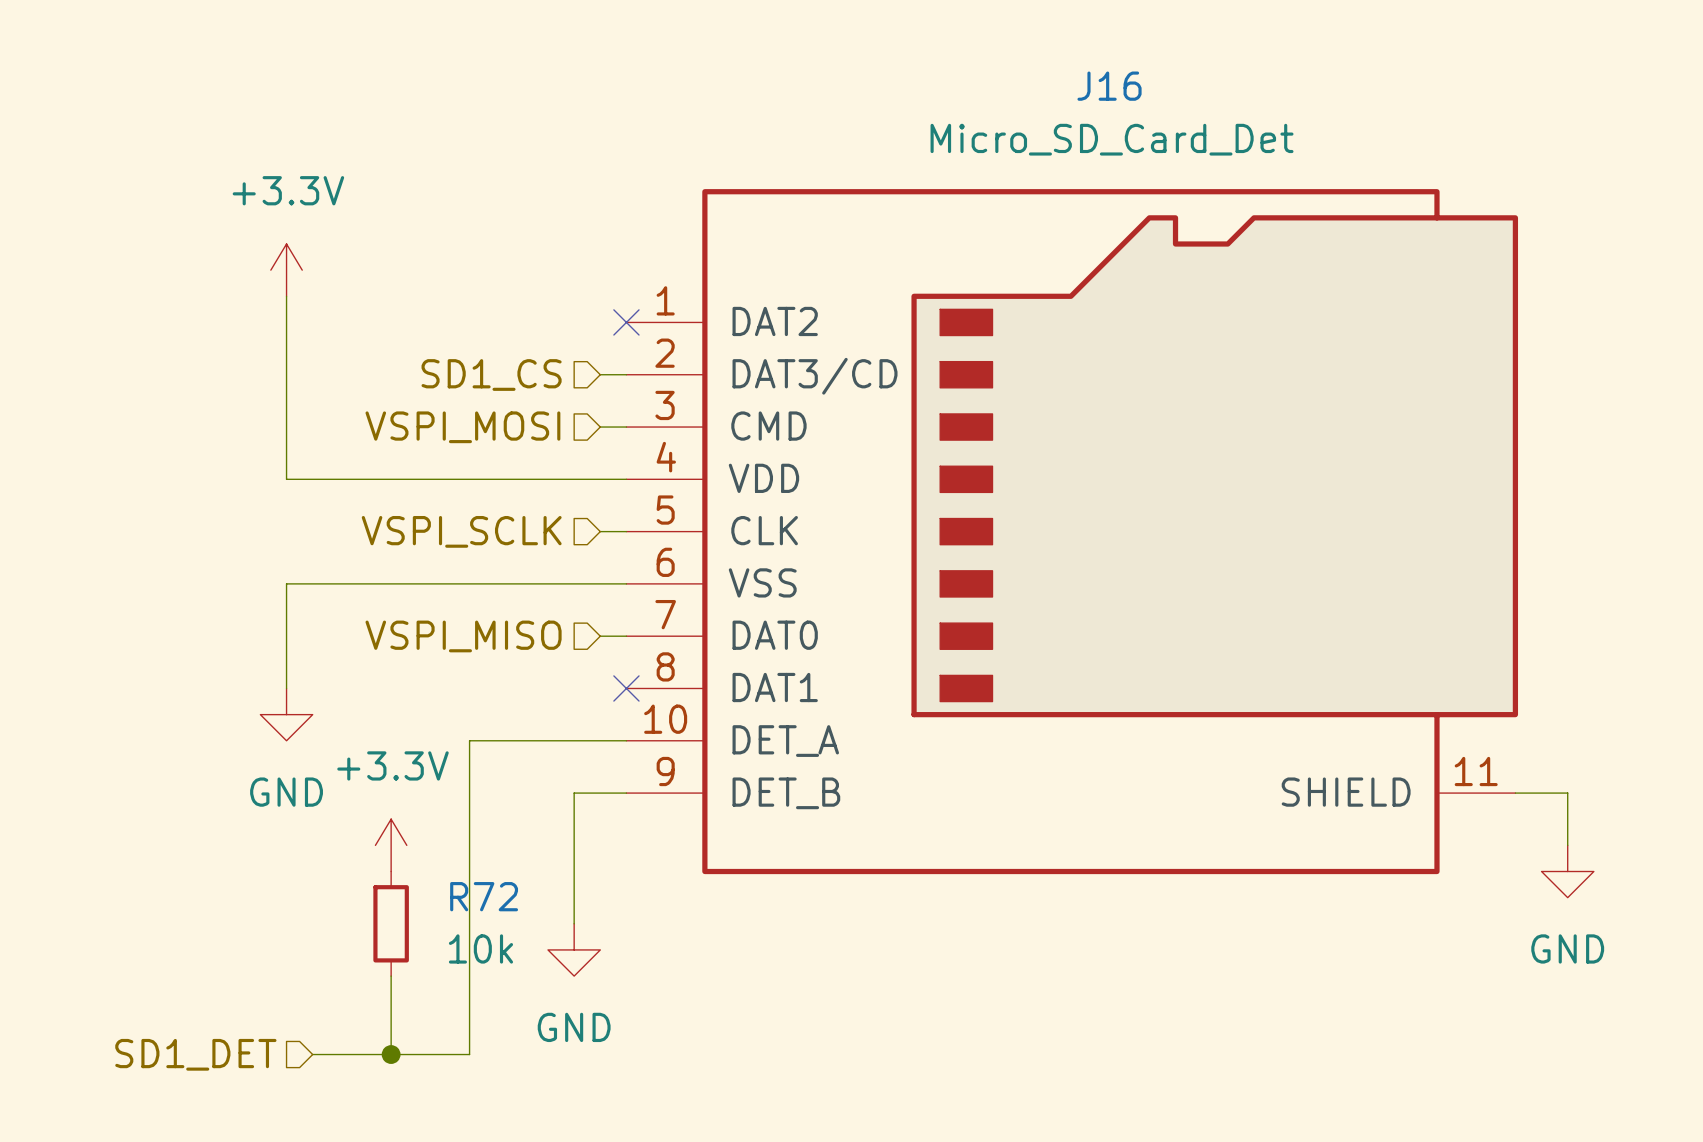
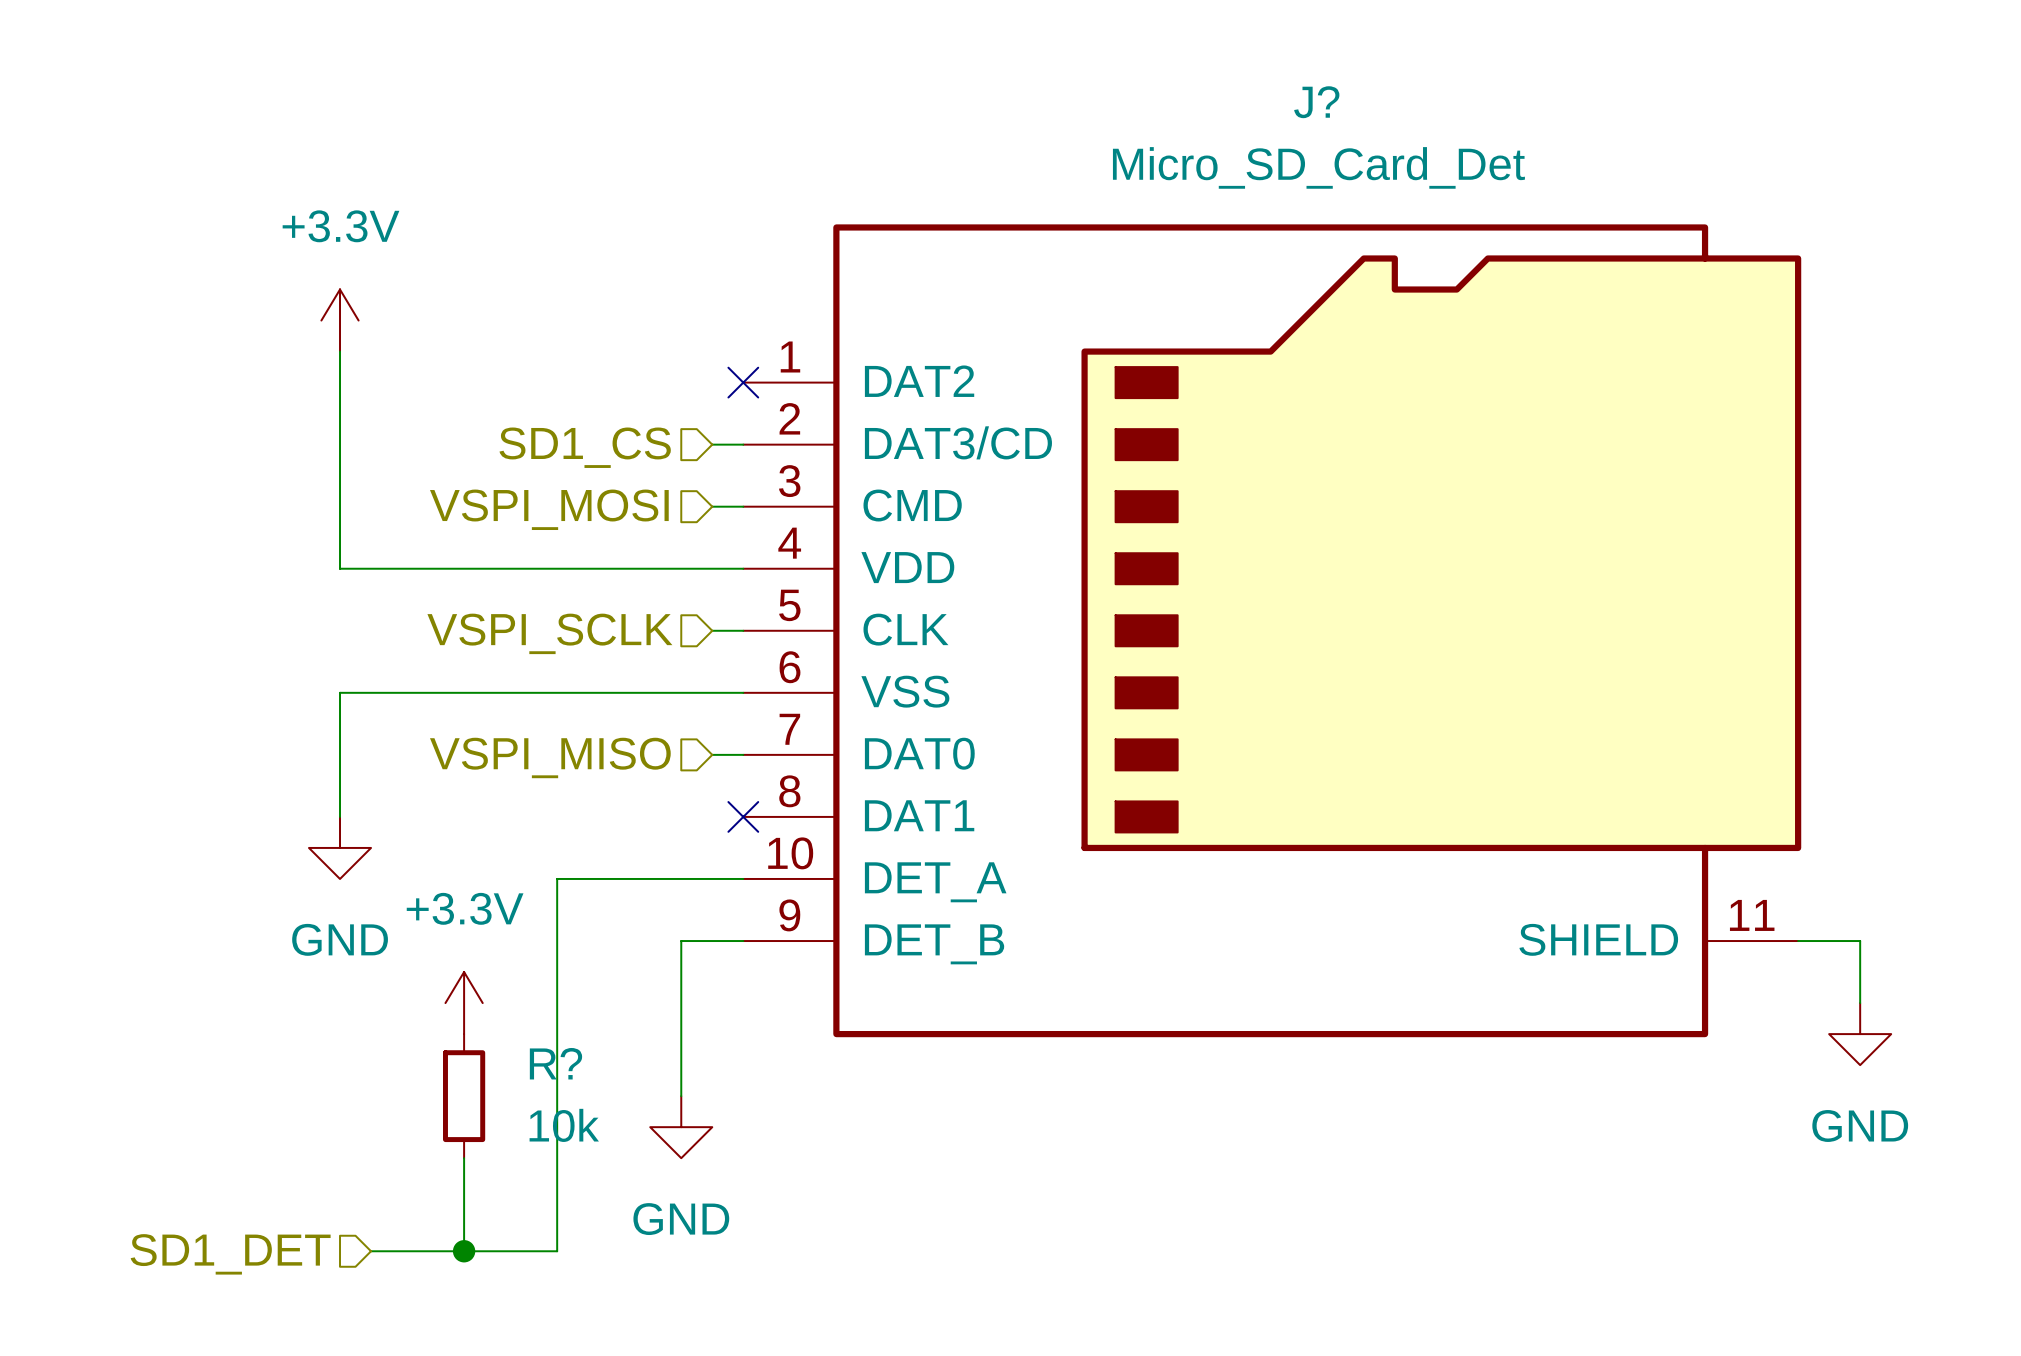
J16 name: J16 (1109, 86) -> J? (1316, 102)
R72 name: R72 (484, 896) -> R? (555, 1063)

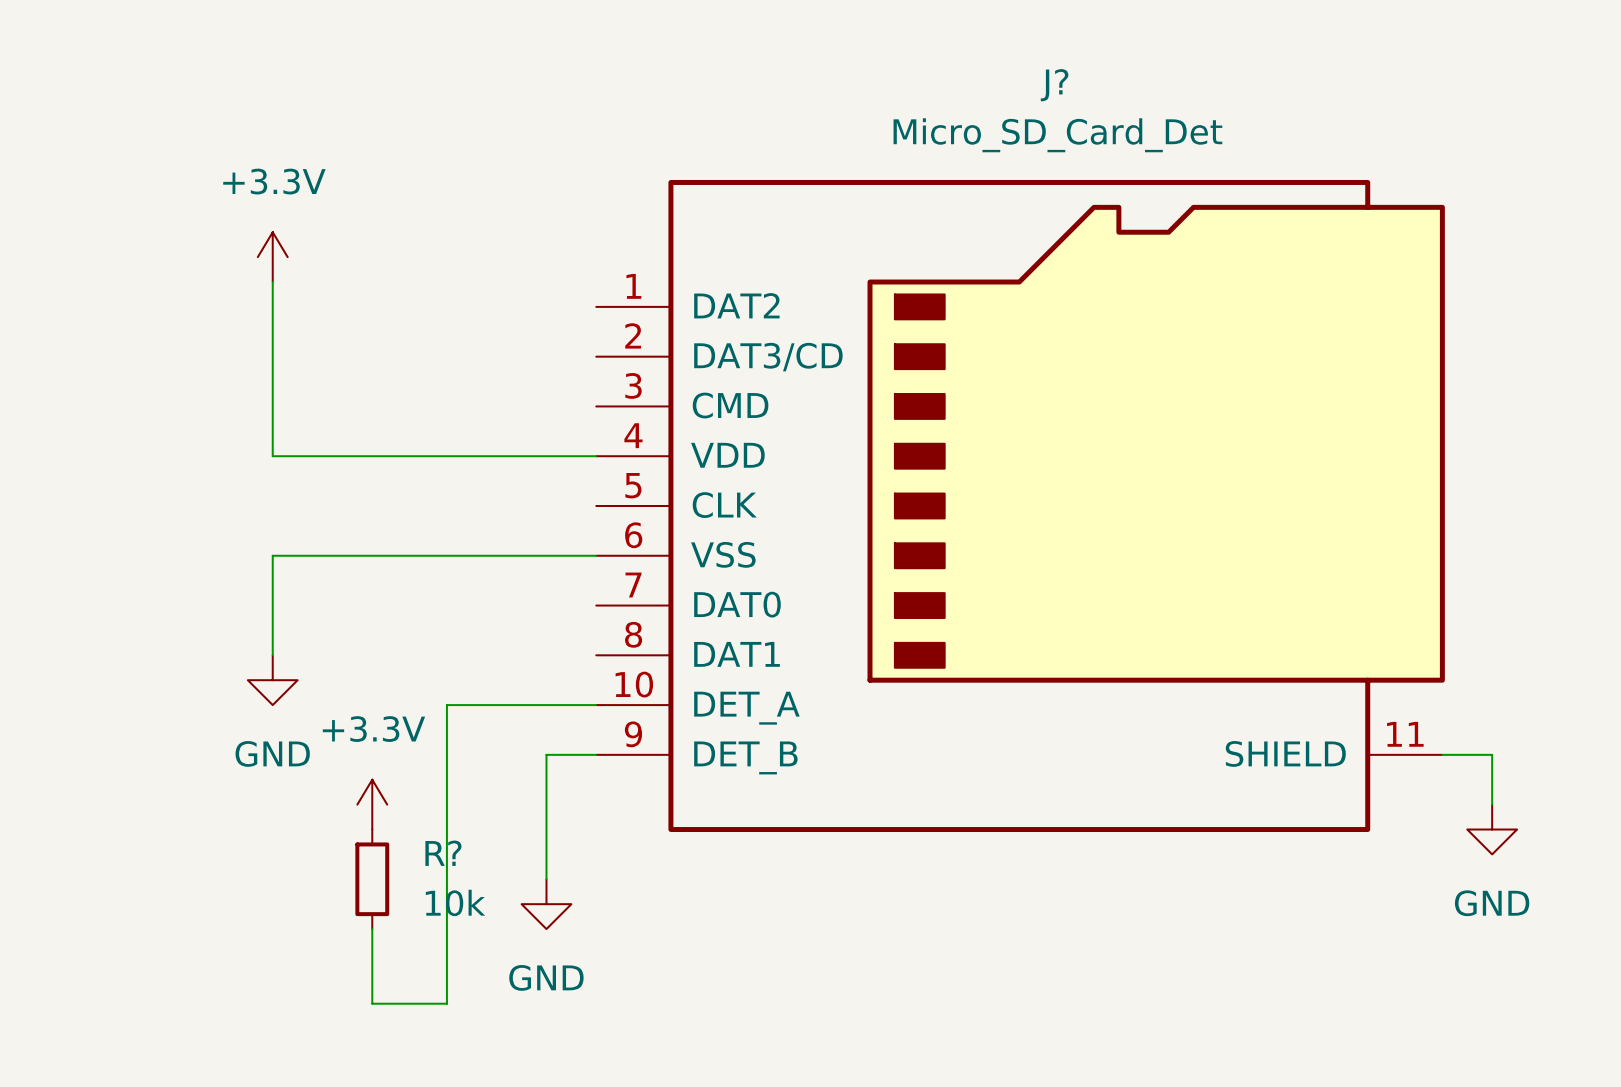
no-connect mark: (743, 382) -> none
wire: (712, 444) (743, 444) -> none
hierarchical label: SD1_CS (585, 447) -> none
wire: (712, 506) (743, 506) -> none
hierarchical label: VSPI_MOSI (549, 509) -> none
wire: (712, 630) (743, 630) -> none
hierarchical label: VSPI_SCLK (549, 633) -> none
wire: (712, 754) (743, 754) -> none
hierarchical label: VSPI_MISO (550, 757) -> none
no-connect mark: (743, 816) -> none
wire: (371, 1251) (464, 1251) -> none
junction: (464, 1251) -> none
hierarchical label: SD1_DET (230, 1254) -> none

